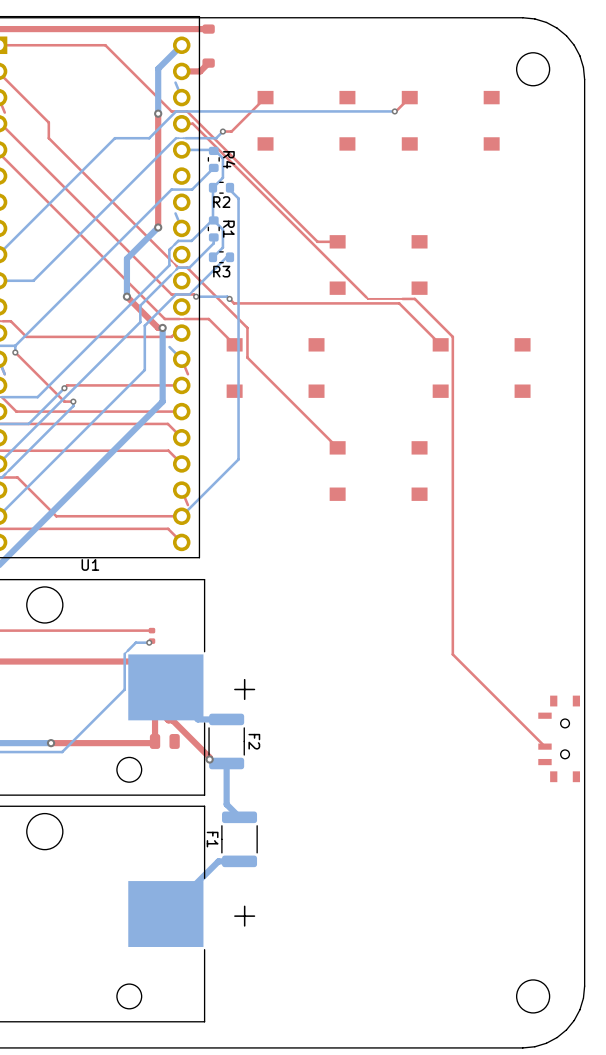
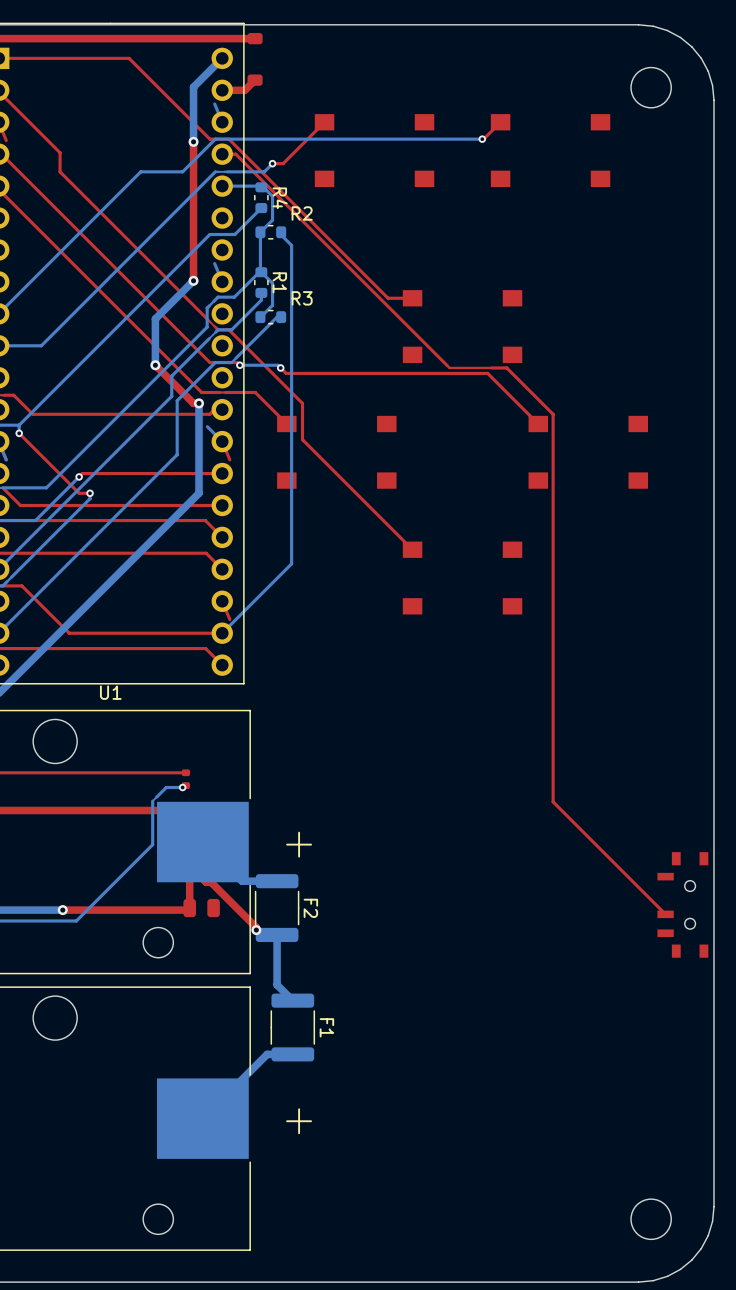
R2 name position: R2 (221, 202) -> R2 (302, 213)
R3 name position: R3 (221, 271) -> R3 (302, 298)
F1 name position: F1 (212, 839) -> F1 (326, 1027)

